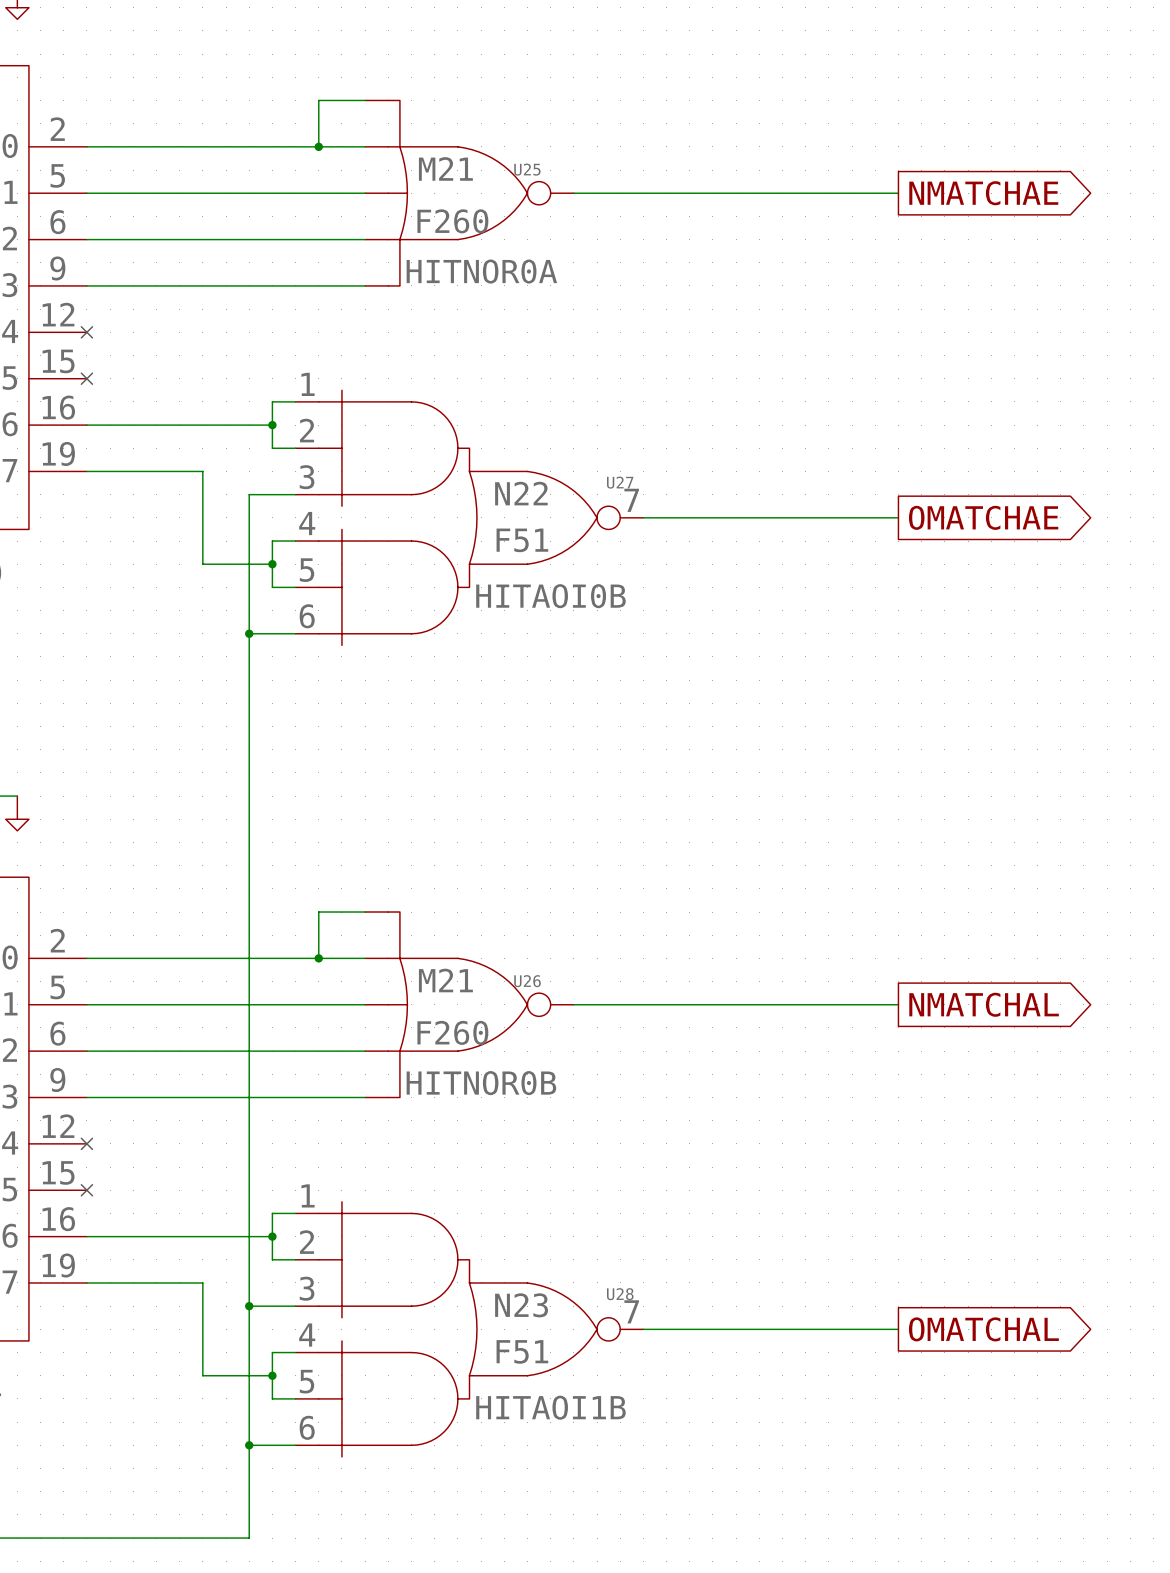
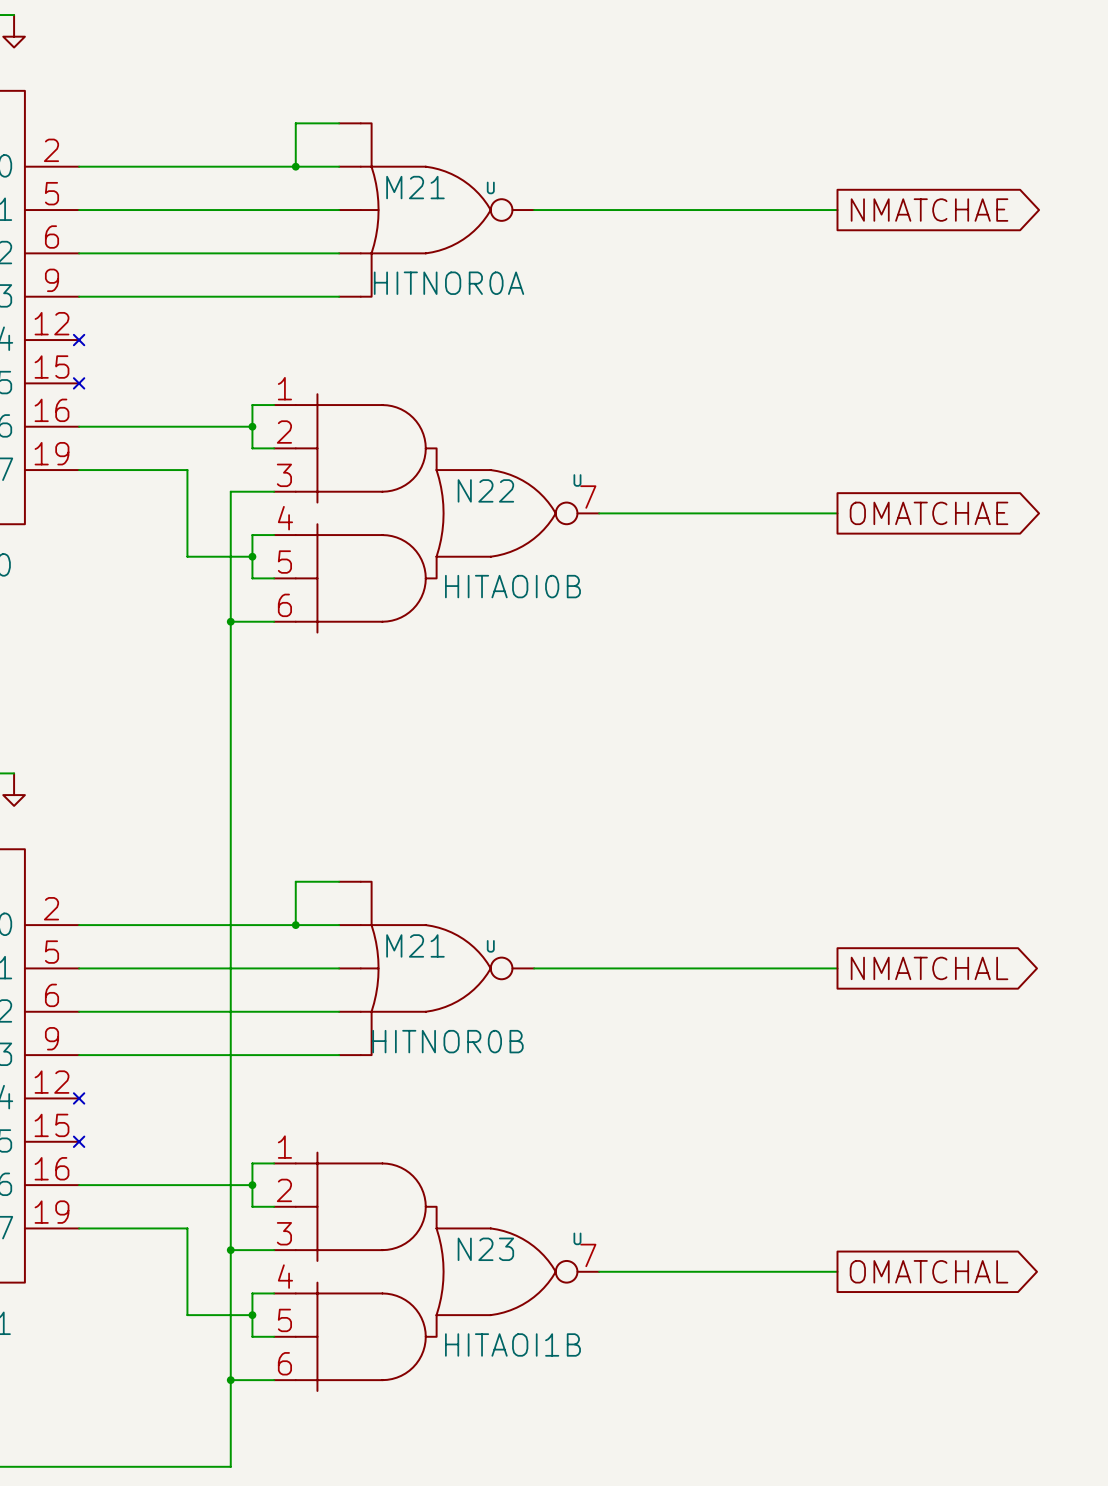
U25 name: U25 (527, 169) -> U (490, 187)
U25 value: F260 (452, 221) -> none
U27 name: U27 (620, 482) -> U (577, 480)
U27 value: F51 (522, 540) -> none
U26 name: U26 (527, 981) -> U (490, 946)
U26 value: F260 (452, 1032) -> none
U28 name: U28 (620, 1294) -> U (577, 1238)
U28 value: F51 (522, 1351) -> none

